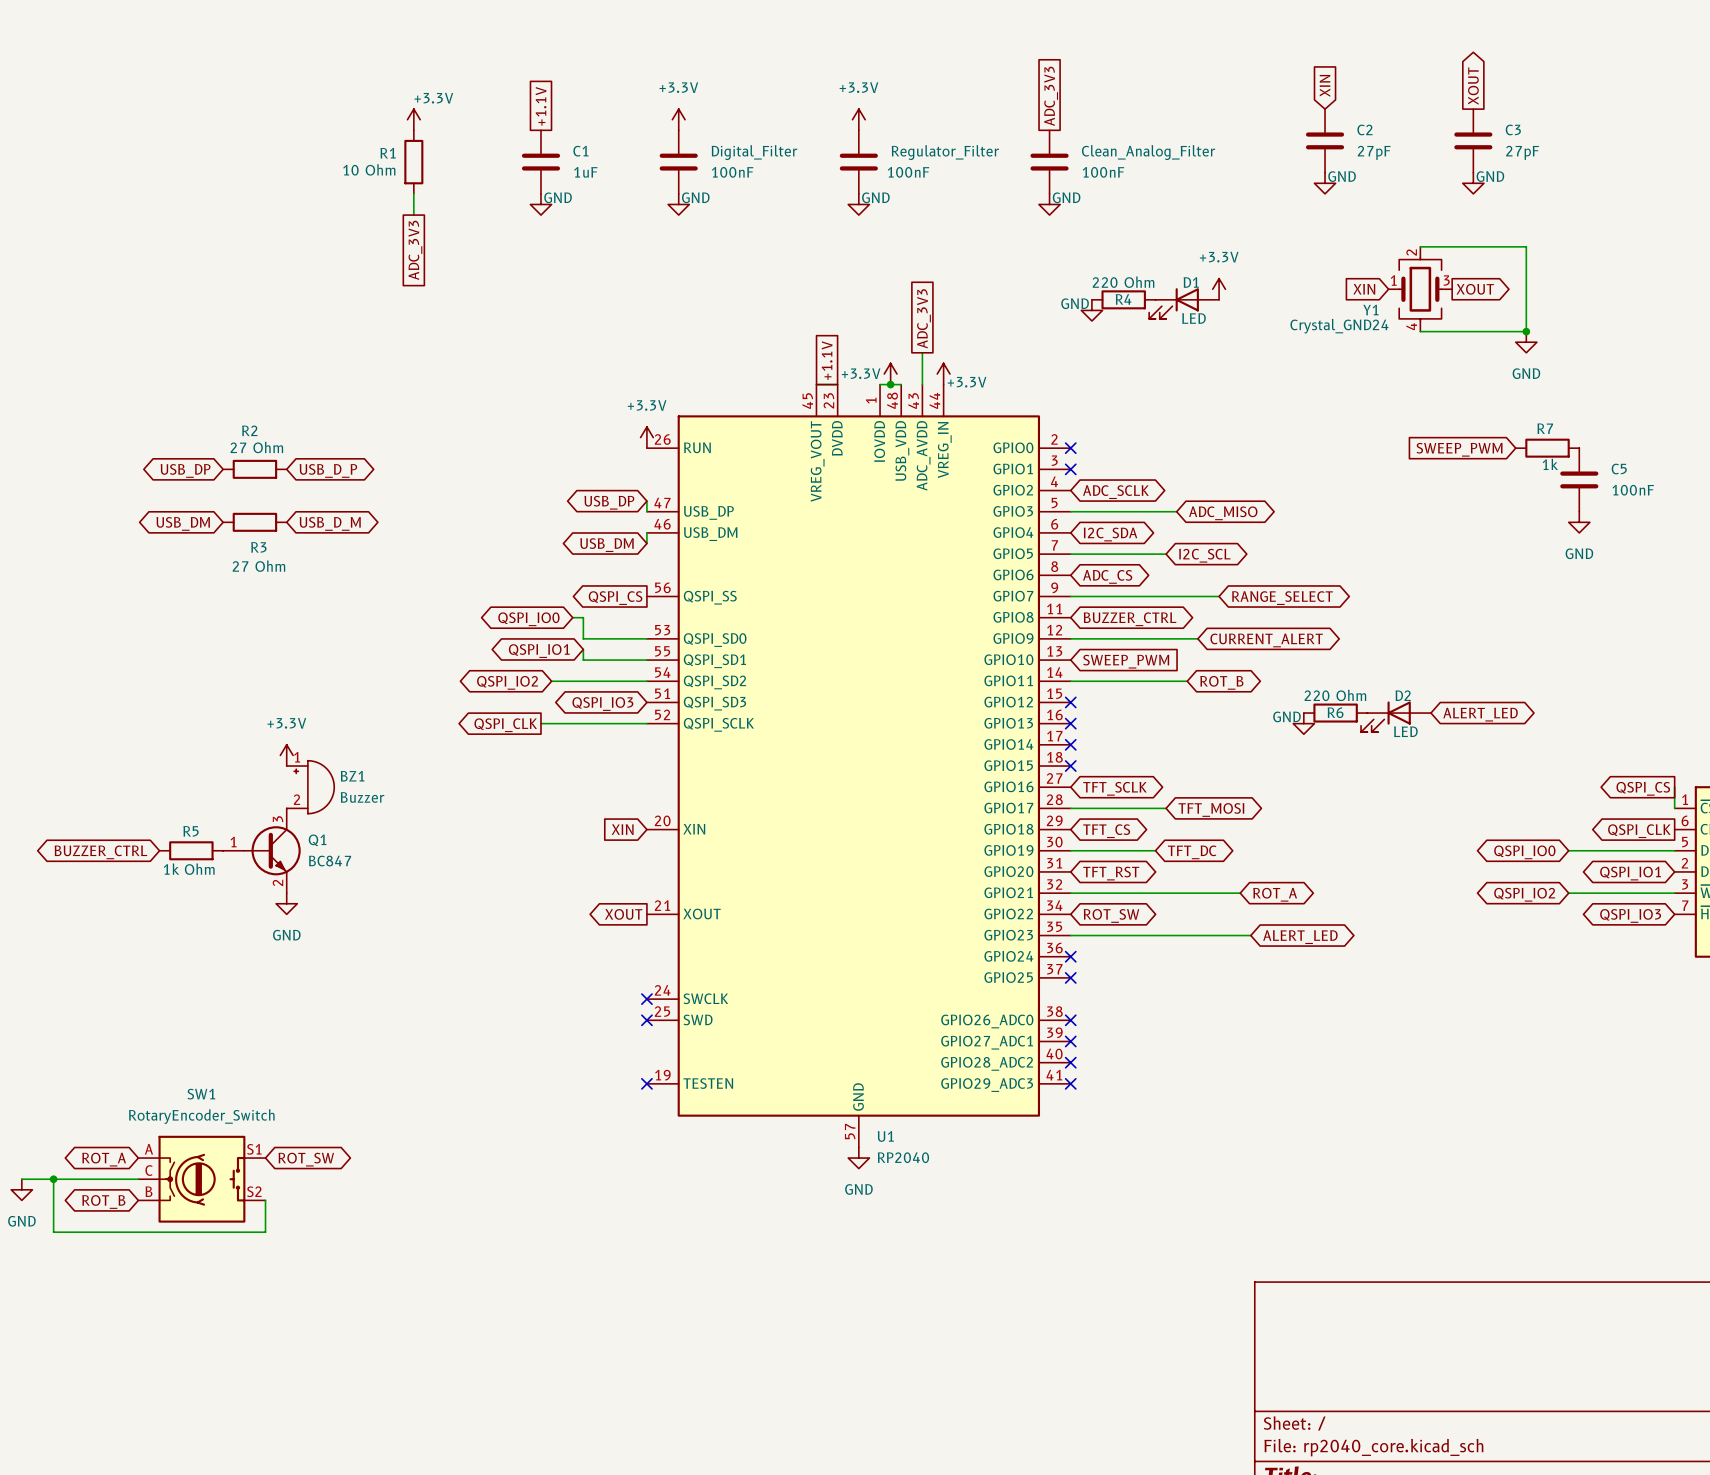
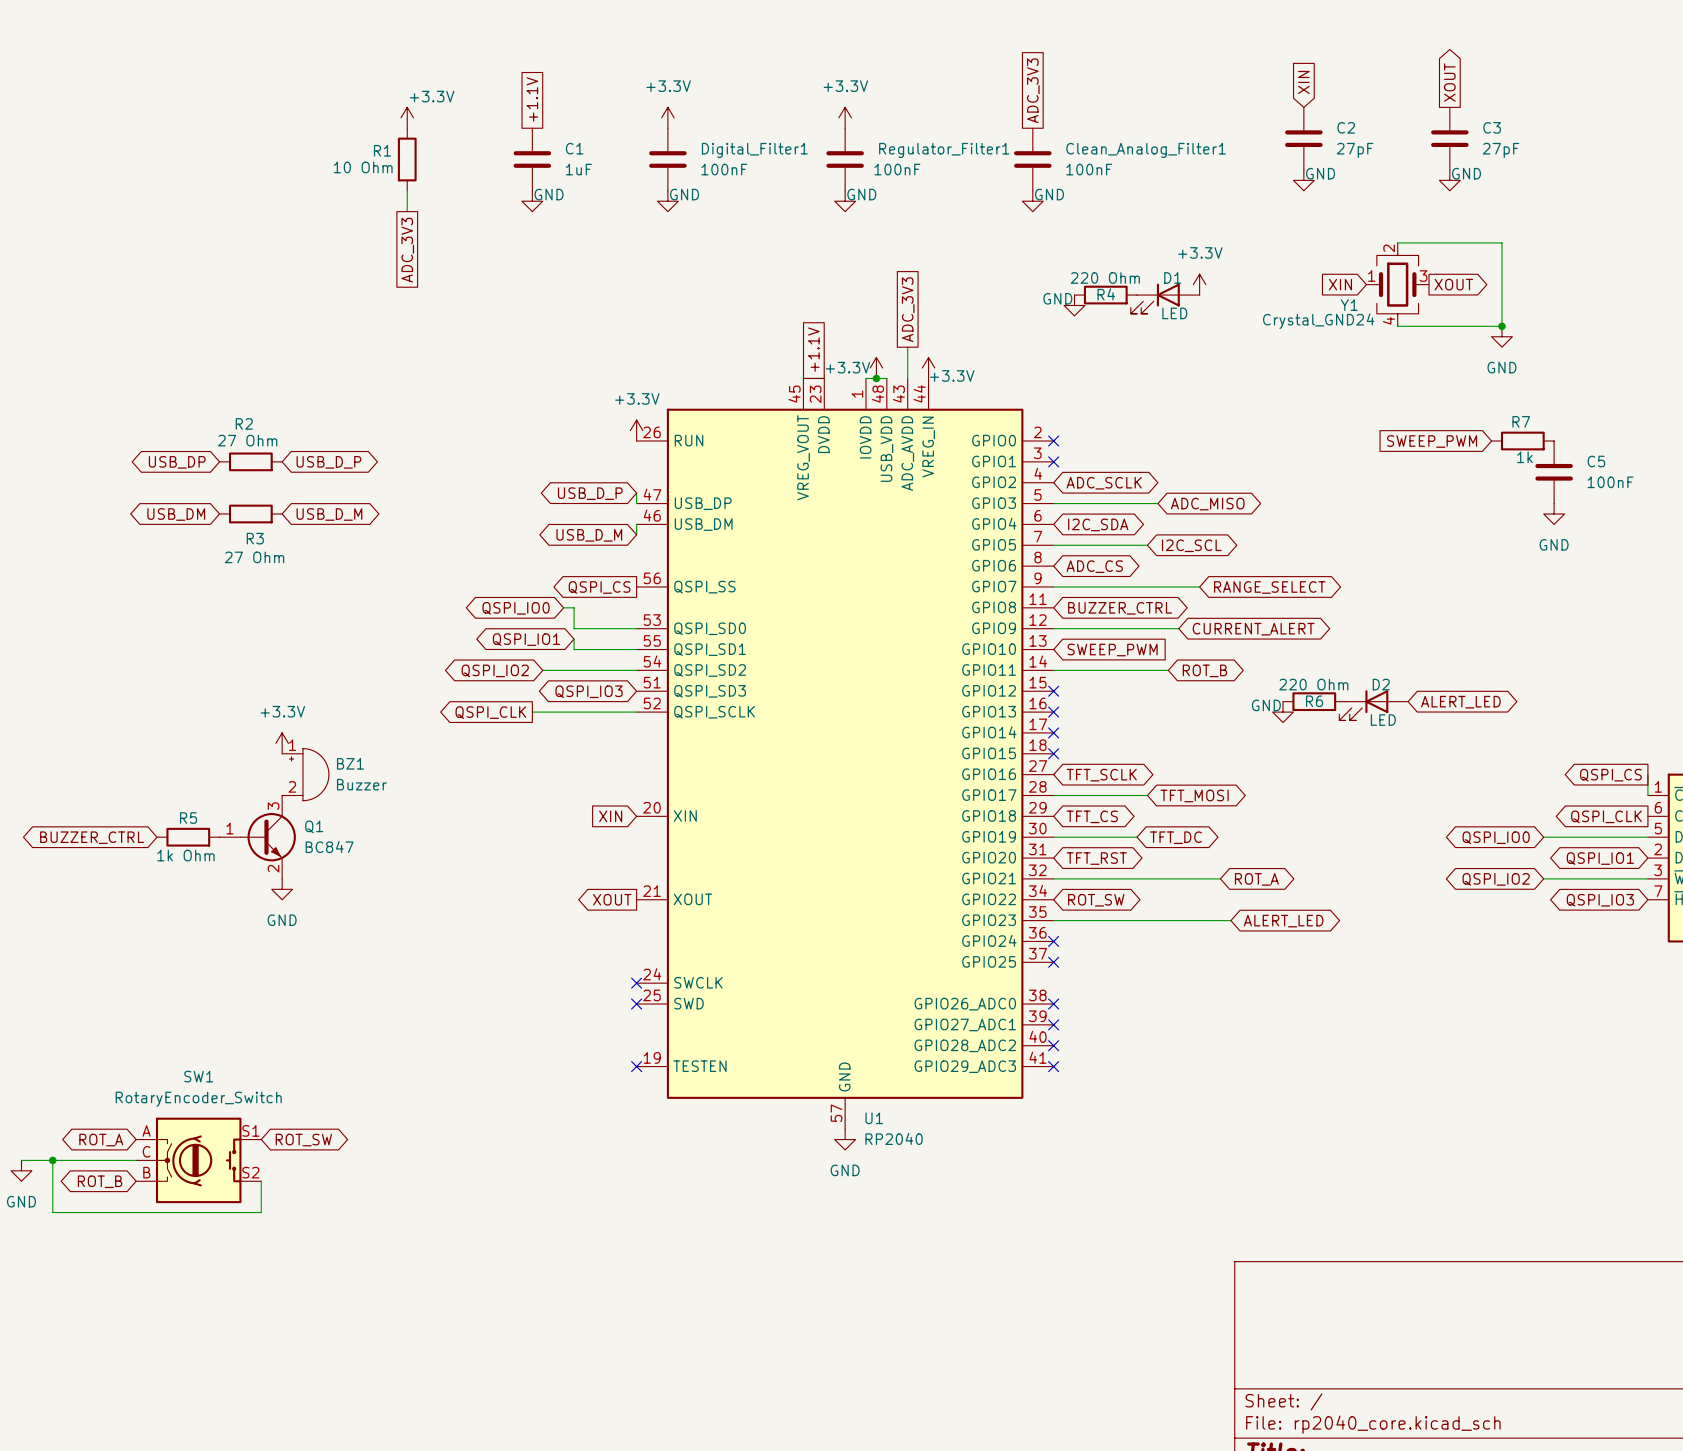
Digital_Filter name: Digital_Filter (754, 152) -> Digital_Filter1 (754, 150)
Regulator_Filter name: Regulator_Filter (945, 152) -> Regulator_Filter1 (944, 150)
Clean_Analog_Filter name: Clean_Analog_Filter (1148, 152) -> Clean_Analog_Filter1 (1146, 150)
global label: USB_DP (609, 502) -> USB_D_P (590, 493)
global label: USB_DM (607, 545) -> USB_D_M (589, 535)

